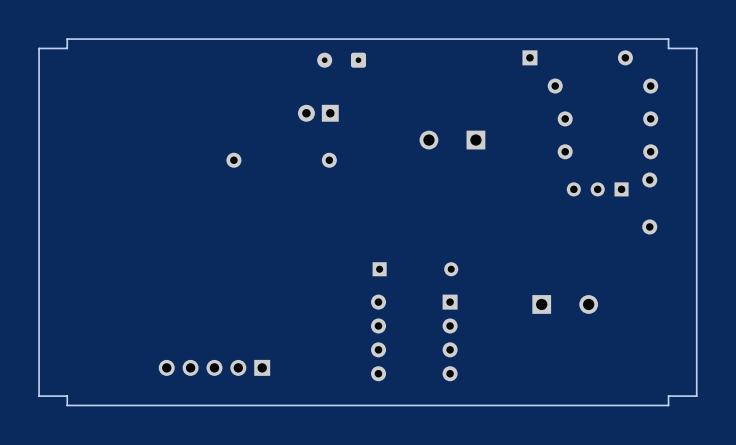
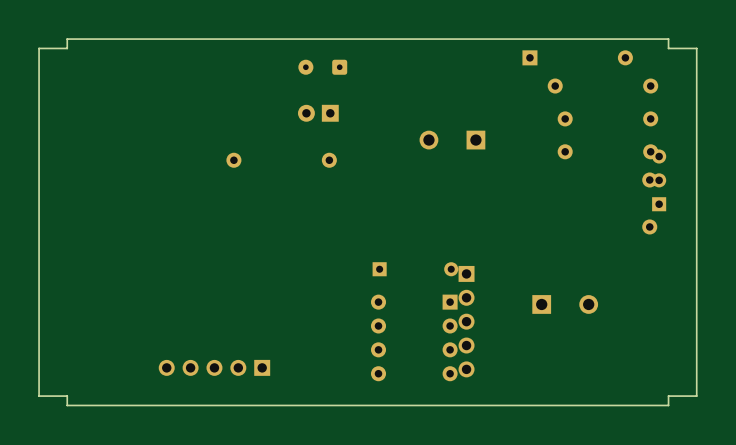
part position: (341, 60) -> (322, 67)
part rotation: 0° (597, 189) -> 90° clockwise (659, 180)
part position: (597, 189) -> (659, 180)
part: none -> (466, 321)

